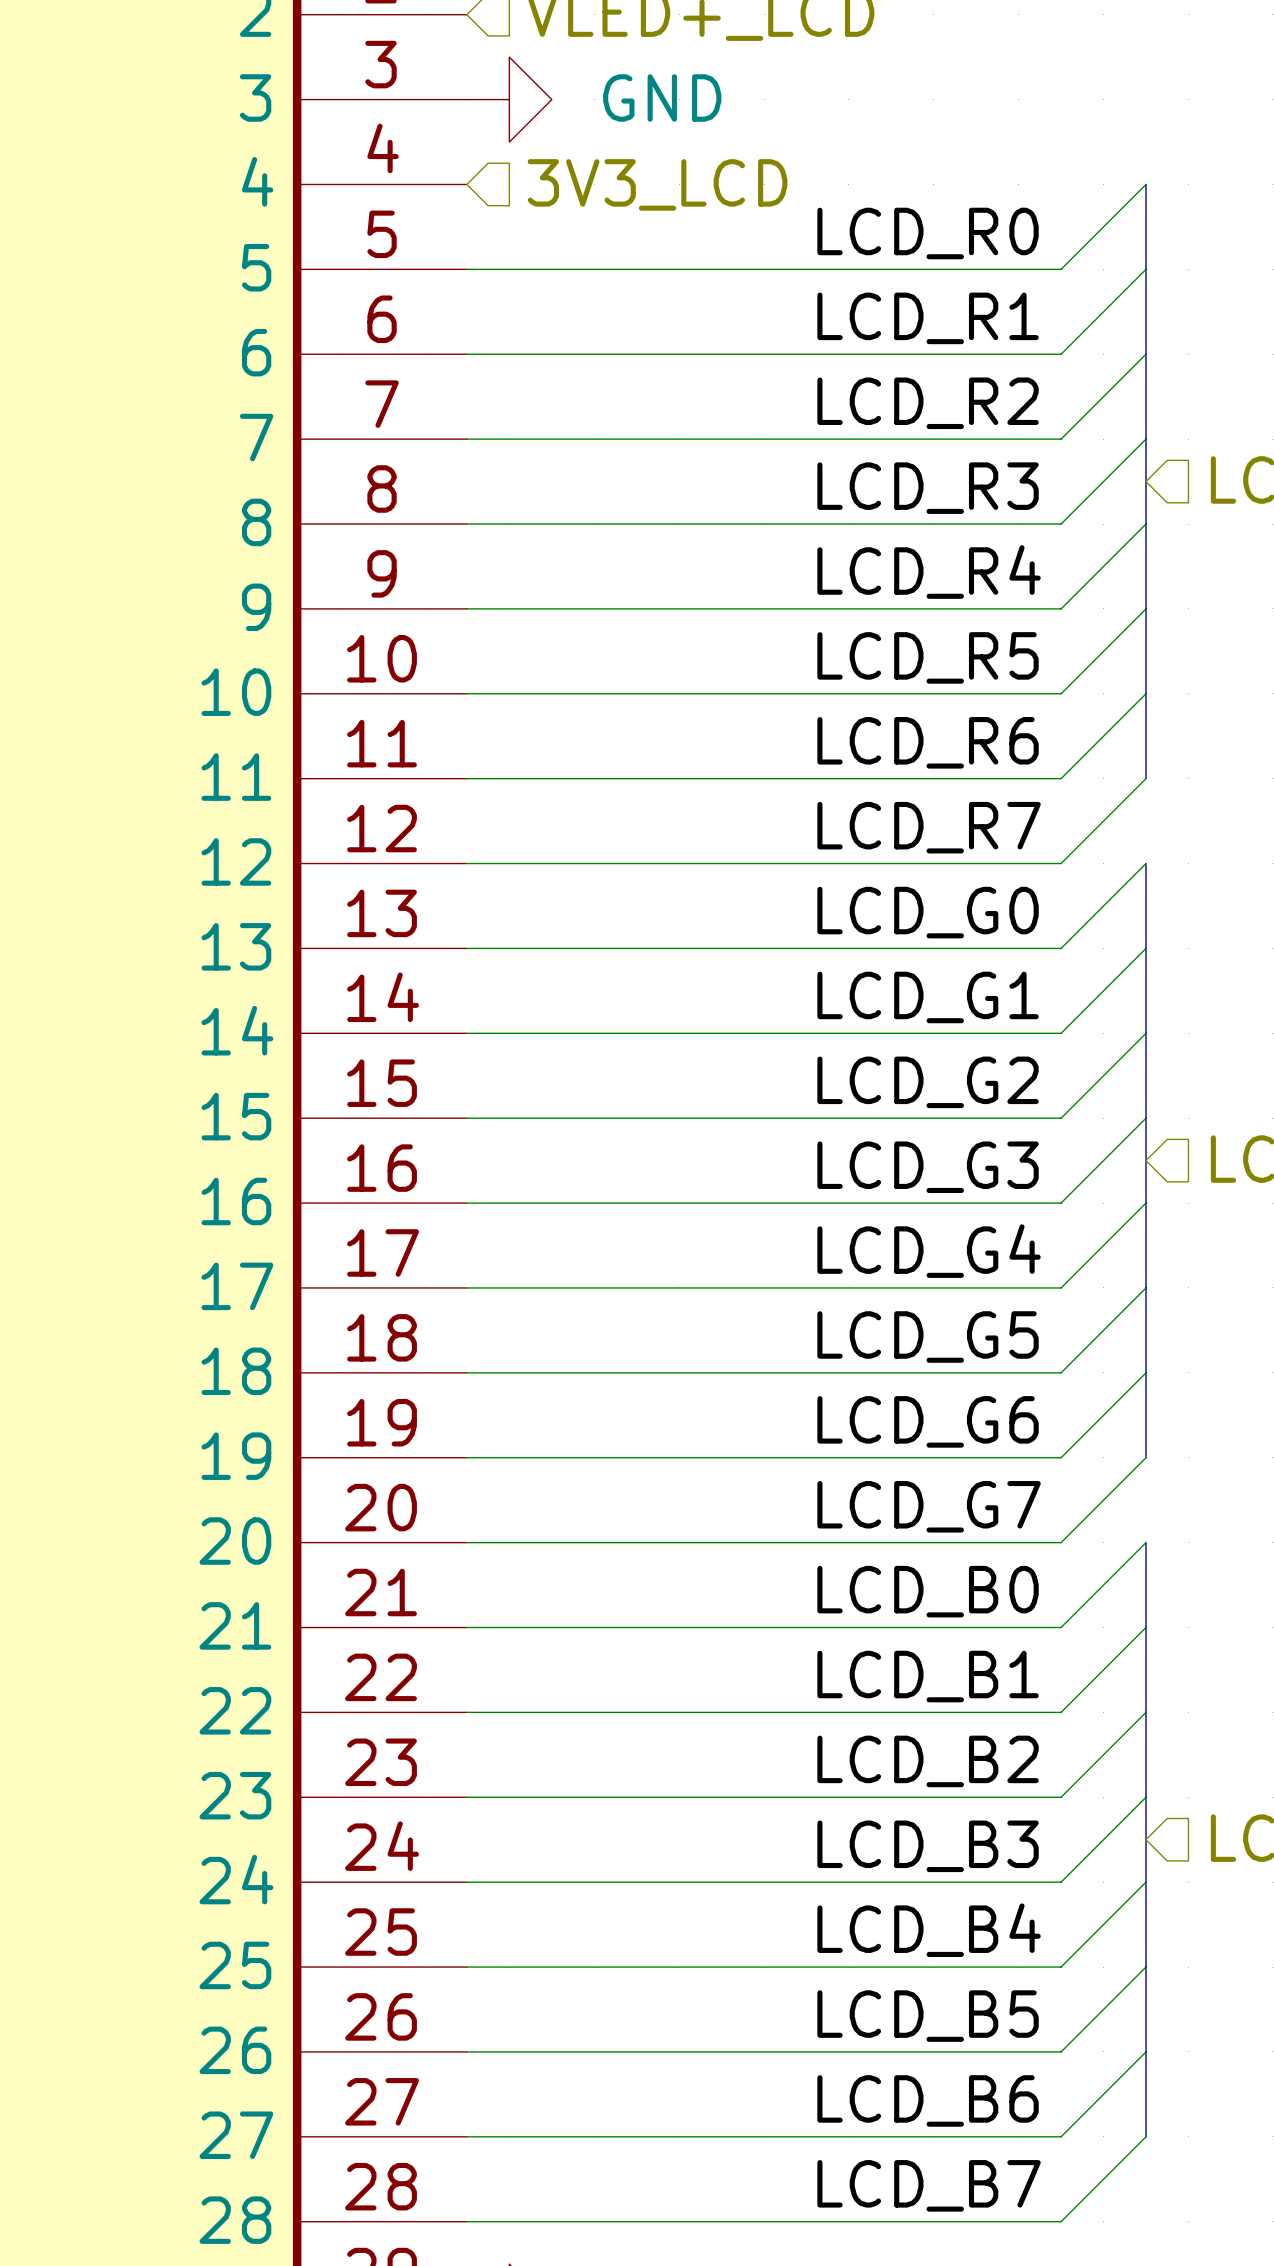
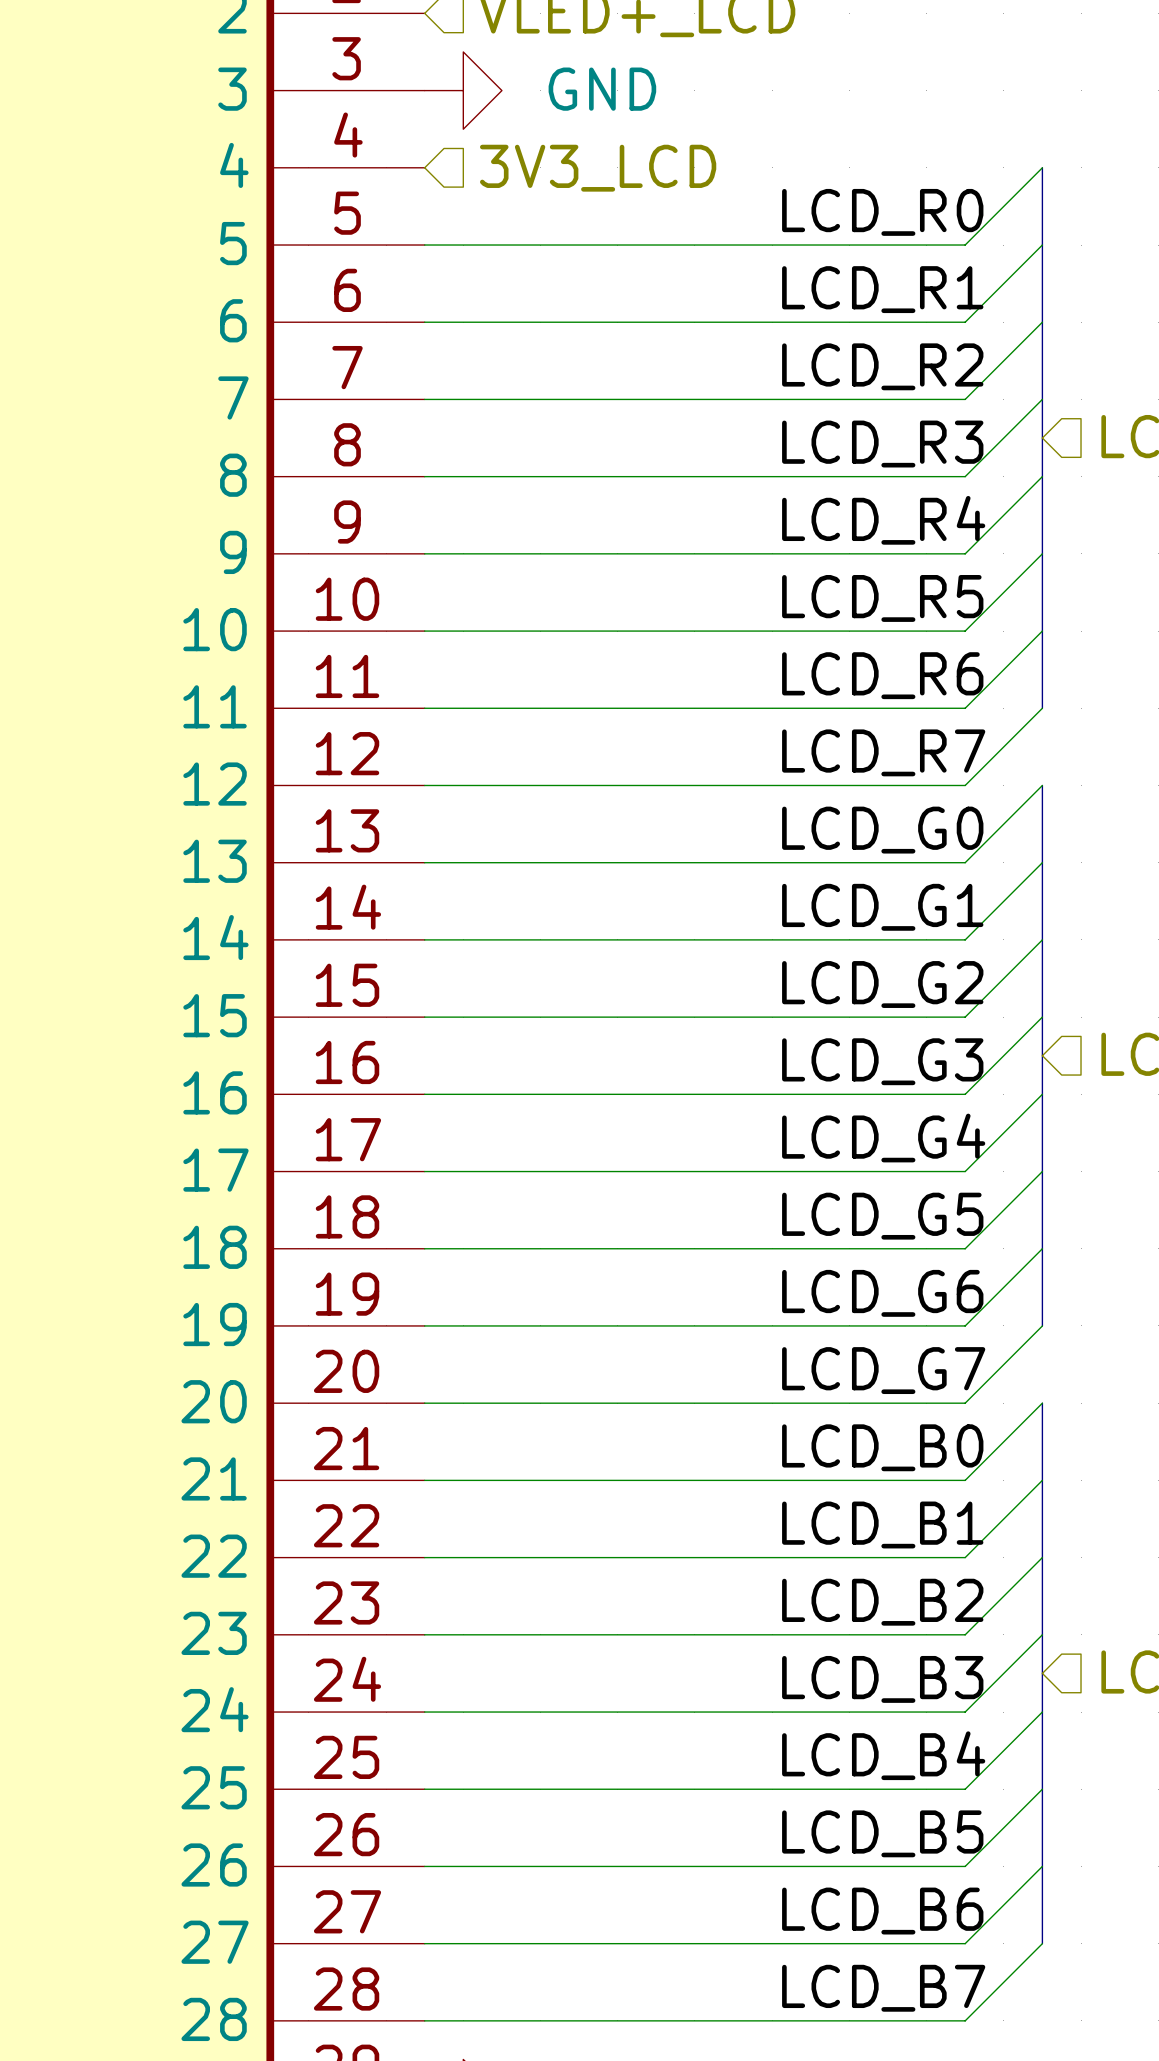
label position: LCD_R0 (928, 233) -> LCD_R0 (882, 212)
label position: LCD_R1 (928, 318) -> LCD_R1 (882, 289)
label position: LCD_R2 (928, 403) -> LCD_R2 (882, 366)
label position: LCD_R3 (928, 488) -> LCD_R3 (882, 444)
label position: LCD_R4 (929, 572) -> LCD_R4 (883, 520)
label position: LCD_R5 (928, 657) -> LCD_R5 (882, 598)
label position: LCD_R6 (928, 742) -> LCD_R6 (882, 675)
label position: LCD_R7 (929, 827) -> LCD_R7 (883, 752)
label position: LCD_G0 (928, 912) -> LCD_G0 (882, 830)
label position: LCD_G1 (928, 997) -> LCD_G1 (882, 907)
label position: LCD_G2 (928, 1082) -> LCD_G2 (882, 984)
label position: LCD_G3 (928, 1167) -> LCD_G3 (882, 1061)
label position: LCD_G4 (929, 1251) -> LCD_G4 (883, 1138)
label position: LCD_G5 (928, 1337) -> LCD_G5 (882, 1216)
label position: LCD_G6 (928, 1421) -> LCD_G6 (882, 1293)
label position: LCD_G7 (929, 1506) -> LCD_G7 (883, 1370)
label position: LCD_B0 (928, 1591) -> LCD_B0 (882, 1447)
label position: LCD_B1 (928, 1676) -> LCD_B1 (882, 1524)
label position: LCD_B2 (928, 1761) -> LCD_B2 (882, 1602)
label position: LCD_B3 (928, 1846) -> LCD_B3 (882, 1679)
label position: LCD_B4 (929, 1930) -> LCD_B4 (883, 1755)
label position: LCD_B5 (928, 2016) -> LCD_B5 (882, 1833)
label position: LCD_B6 (928, 2100) -> LCD_B6 (882, 1911)
label position: LCD_B7 (929, 2185) -> LCD_B7 (883, 1988)

